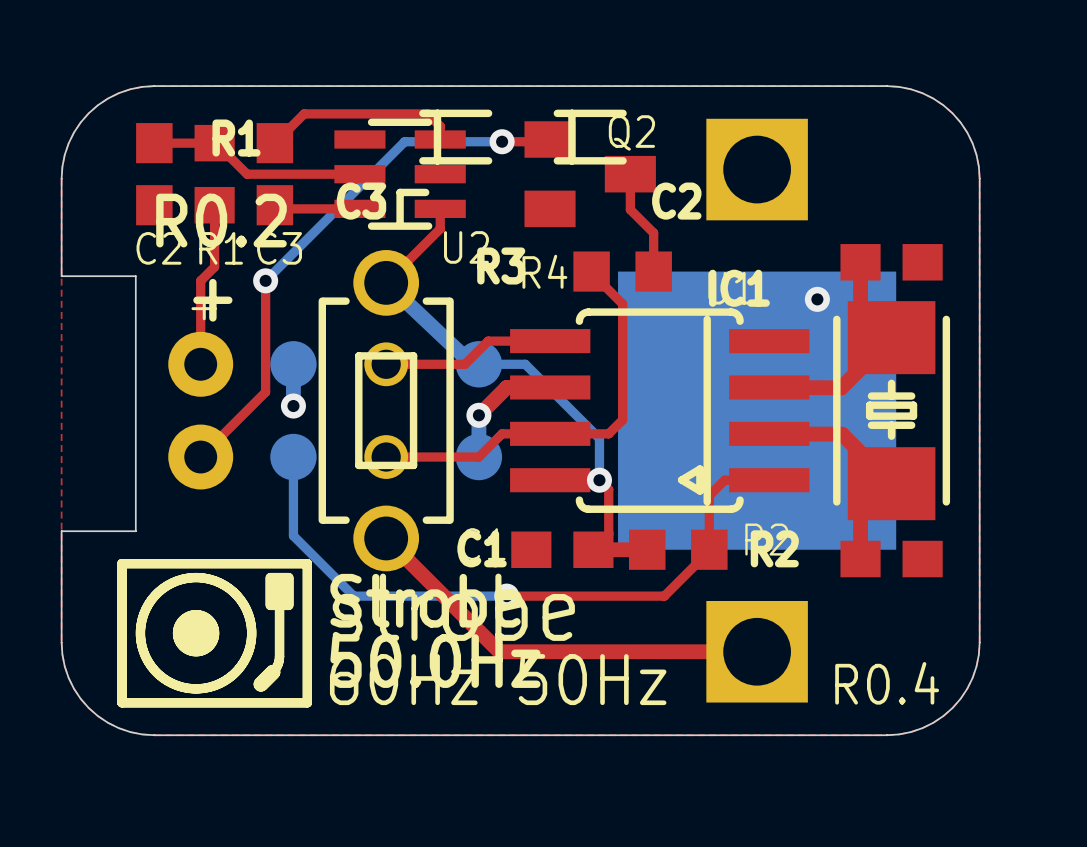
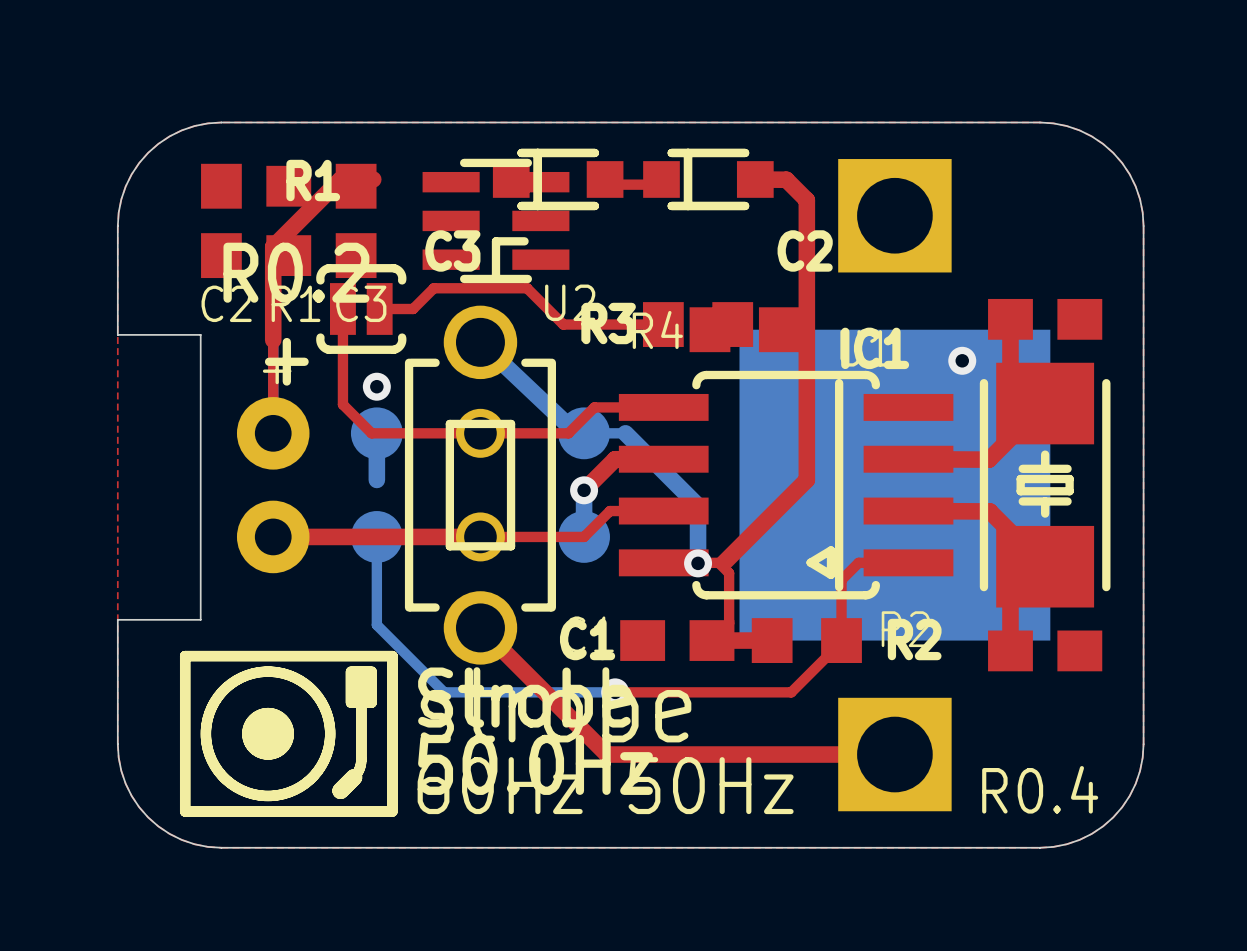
part: none -> (558, 179)
part: none -> (708, 179)
top track: none -> (755, 179) (786, 179) (806, 200) (806, 479) (723, 562)
top track: (440, 139) (440, 126) (427, 113) (304, 113) (274, 143) -> none
bottom track: (502, 141) (404, 141) (265, 280) -> none
via: (502, 141) -> none
top track: (154, 143) (216, 143) (247, 174) (359, 174) -> none
Q2: (590, 174) -> none
top track: (630, 174) (630, 209) (653, 233) (653, 271) -> none
top track: (214, 205) (214, 266) (200, 280) -> (373, 179) (340, 179) (273, 246) (273, 340)
top track: (274, 205) (278, 208) (359, 208) -> none
top track: (440, 208) (440, 228) (386, 282) -> none
top track: none -> (342, 308) (342, 404) (371, 433) (480, 433)
part: none -> (361, 308)
top track: none -> (379, 308) (413, 308) (433, 288) (527, 288) (563, 324) (663, 324)
part: none -> (698, 324)
top track: (591, 271) (622, 304) (622, 419) (608, 433) (550, 433) -> none
top track: (265, 280) (265, 392) (200, 457) -> (480, 536) (273, 536)
via: (265, 280) -> none
via: none -> (376, 386)
bottom track: (516, 364) (525, 364) (599, 438) (599, 480) -> (625, 433) (698, 505) (698, 563)
via: (293, 406) -> none
via position: (599, 480) -> (698, 563)

